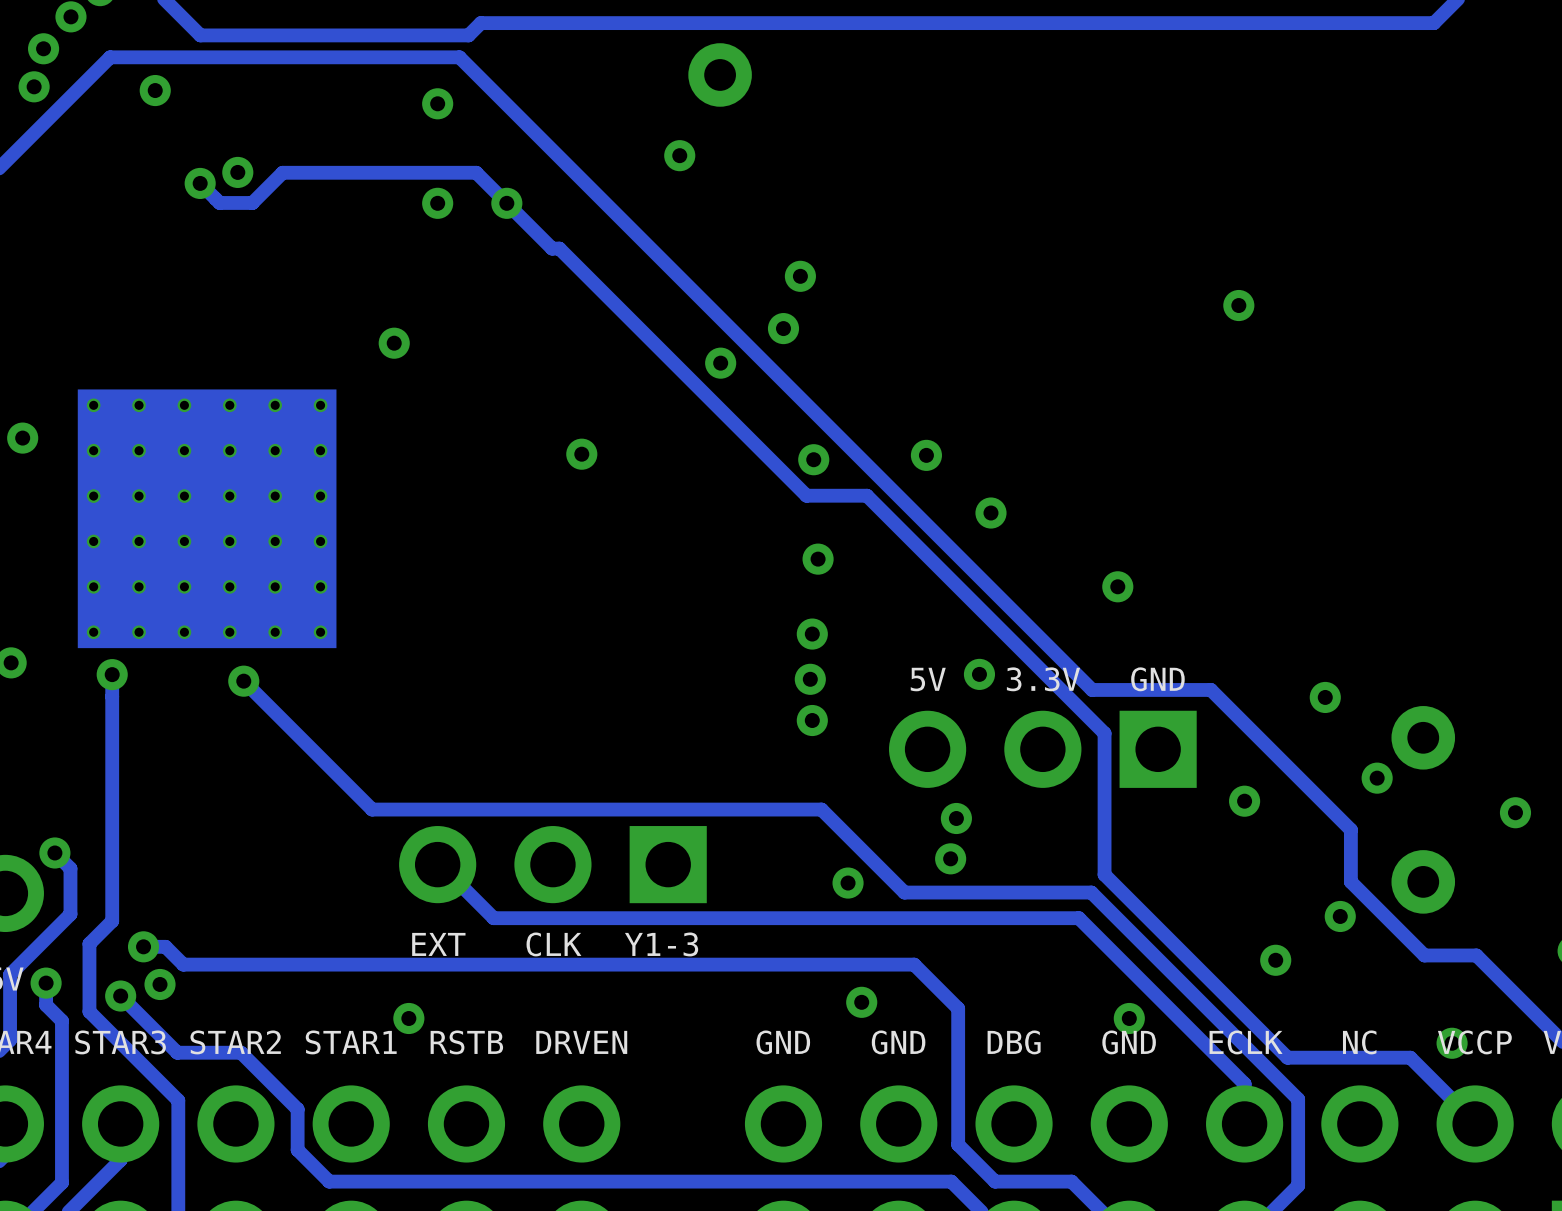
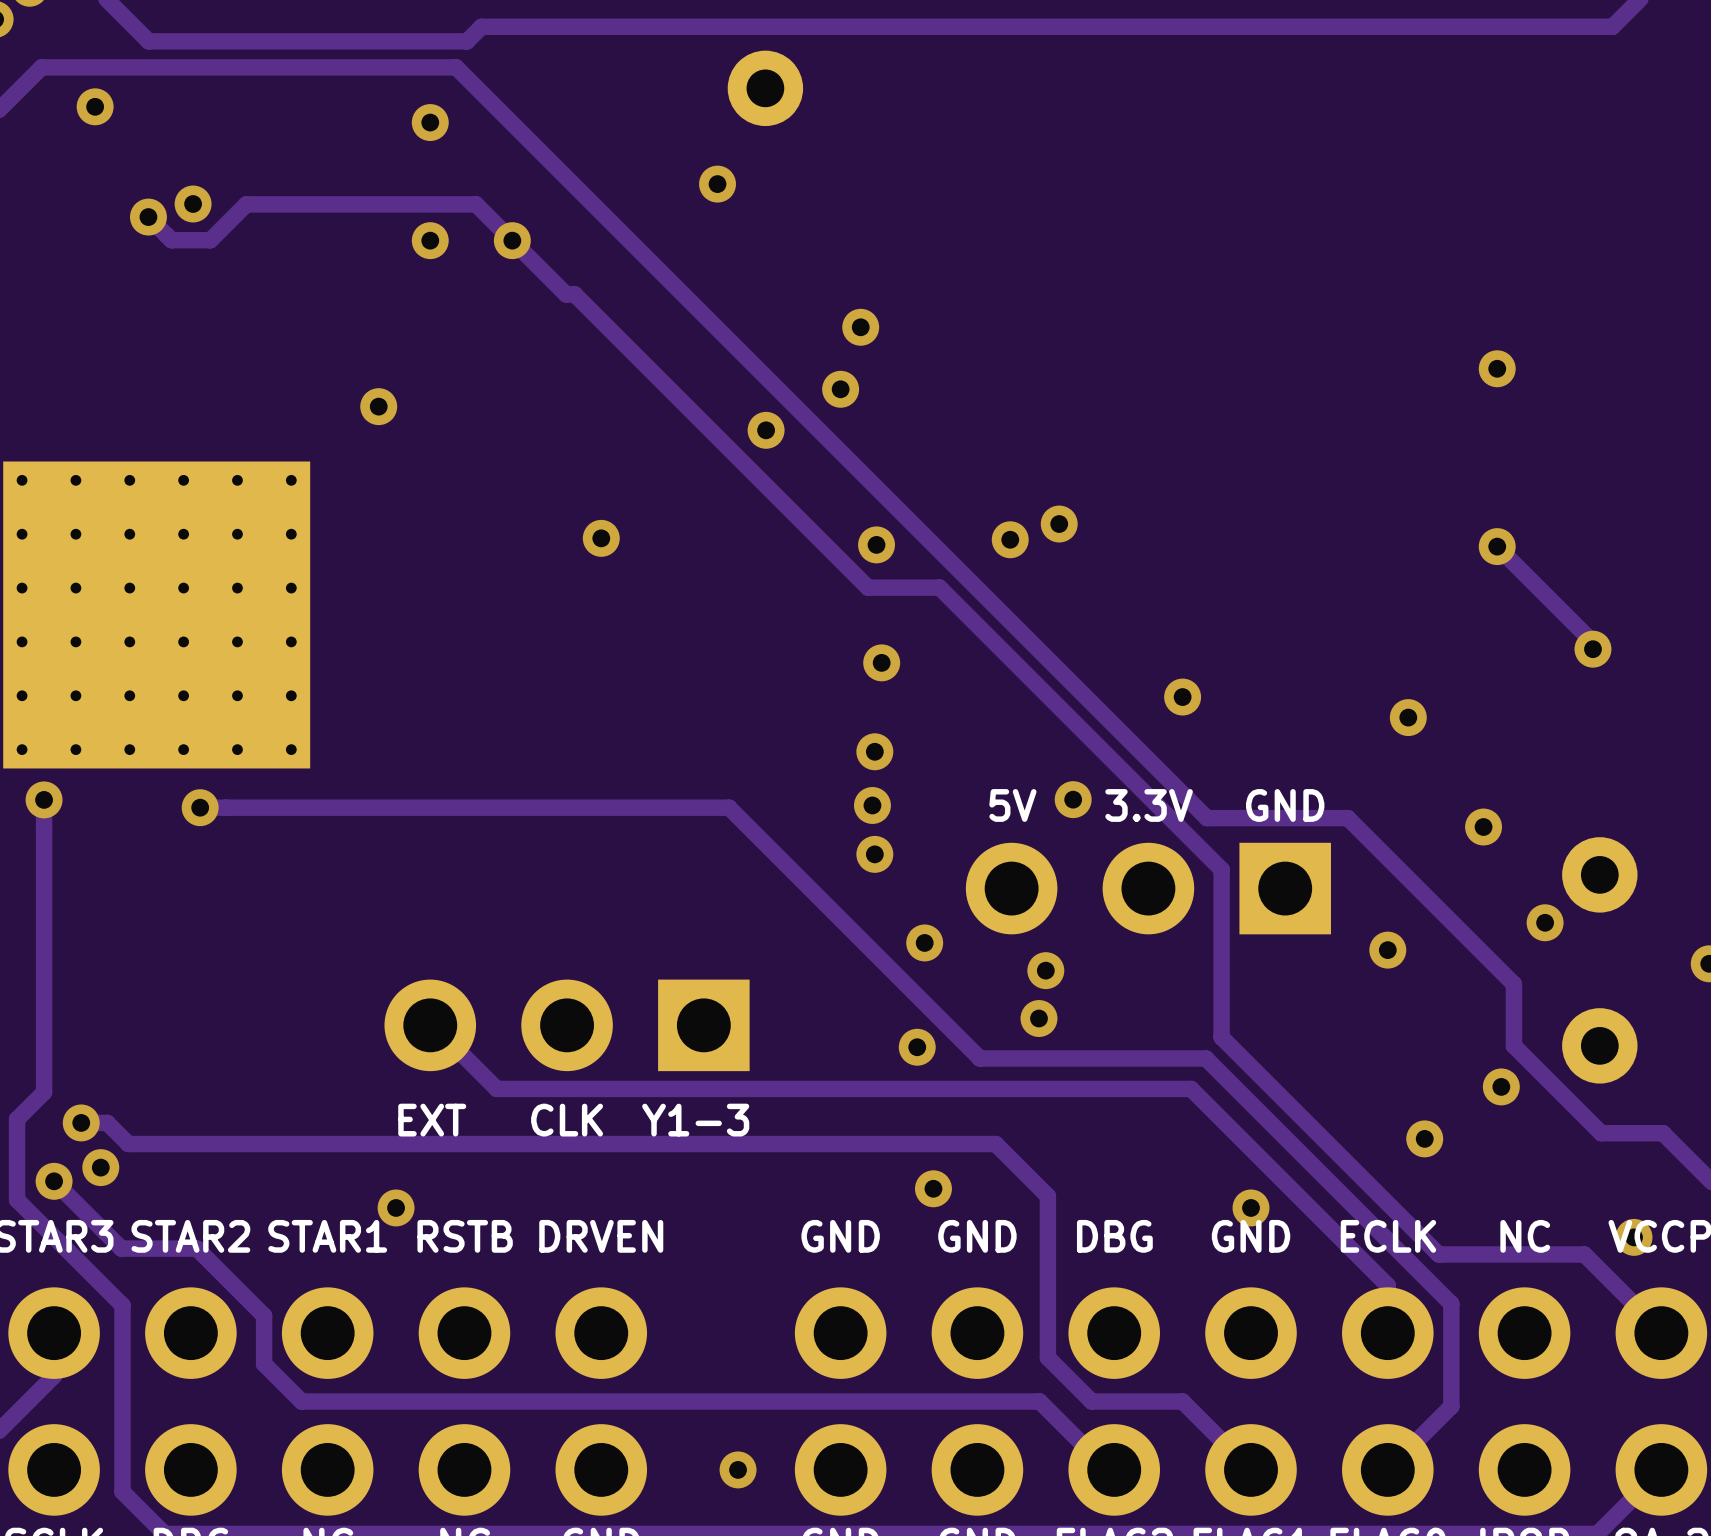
via: (1238, 305) -> none
via: none -> (1497, 368)
via: none -> (1059, 524)
track: none -> (1497, 546) (1592, 642) (1592, 649)
via: none -> (1497, 546)
via: (990, 513) -> none
via: none -> (1592, 649)
via position: (1117, 586) -> (1182, 697)
via: none -> (1408, 717)
track: (243, 681) (372, 809) (821, 809) (904, 892) -> (200, 807) (729, 807) (979, 1058) (984, 1058)
via: none -> (924, 942)

